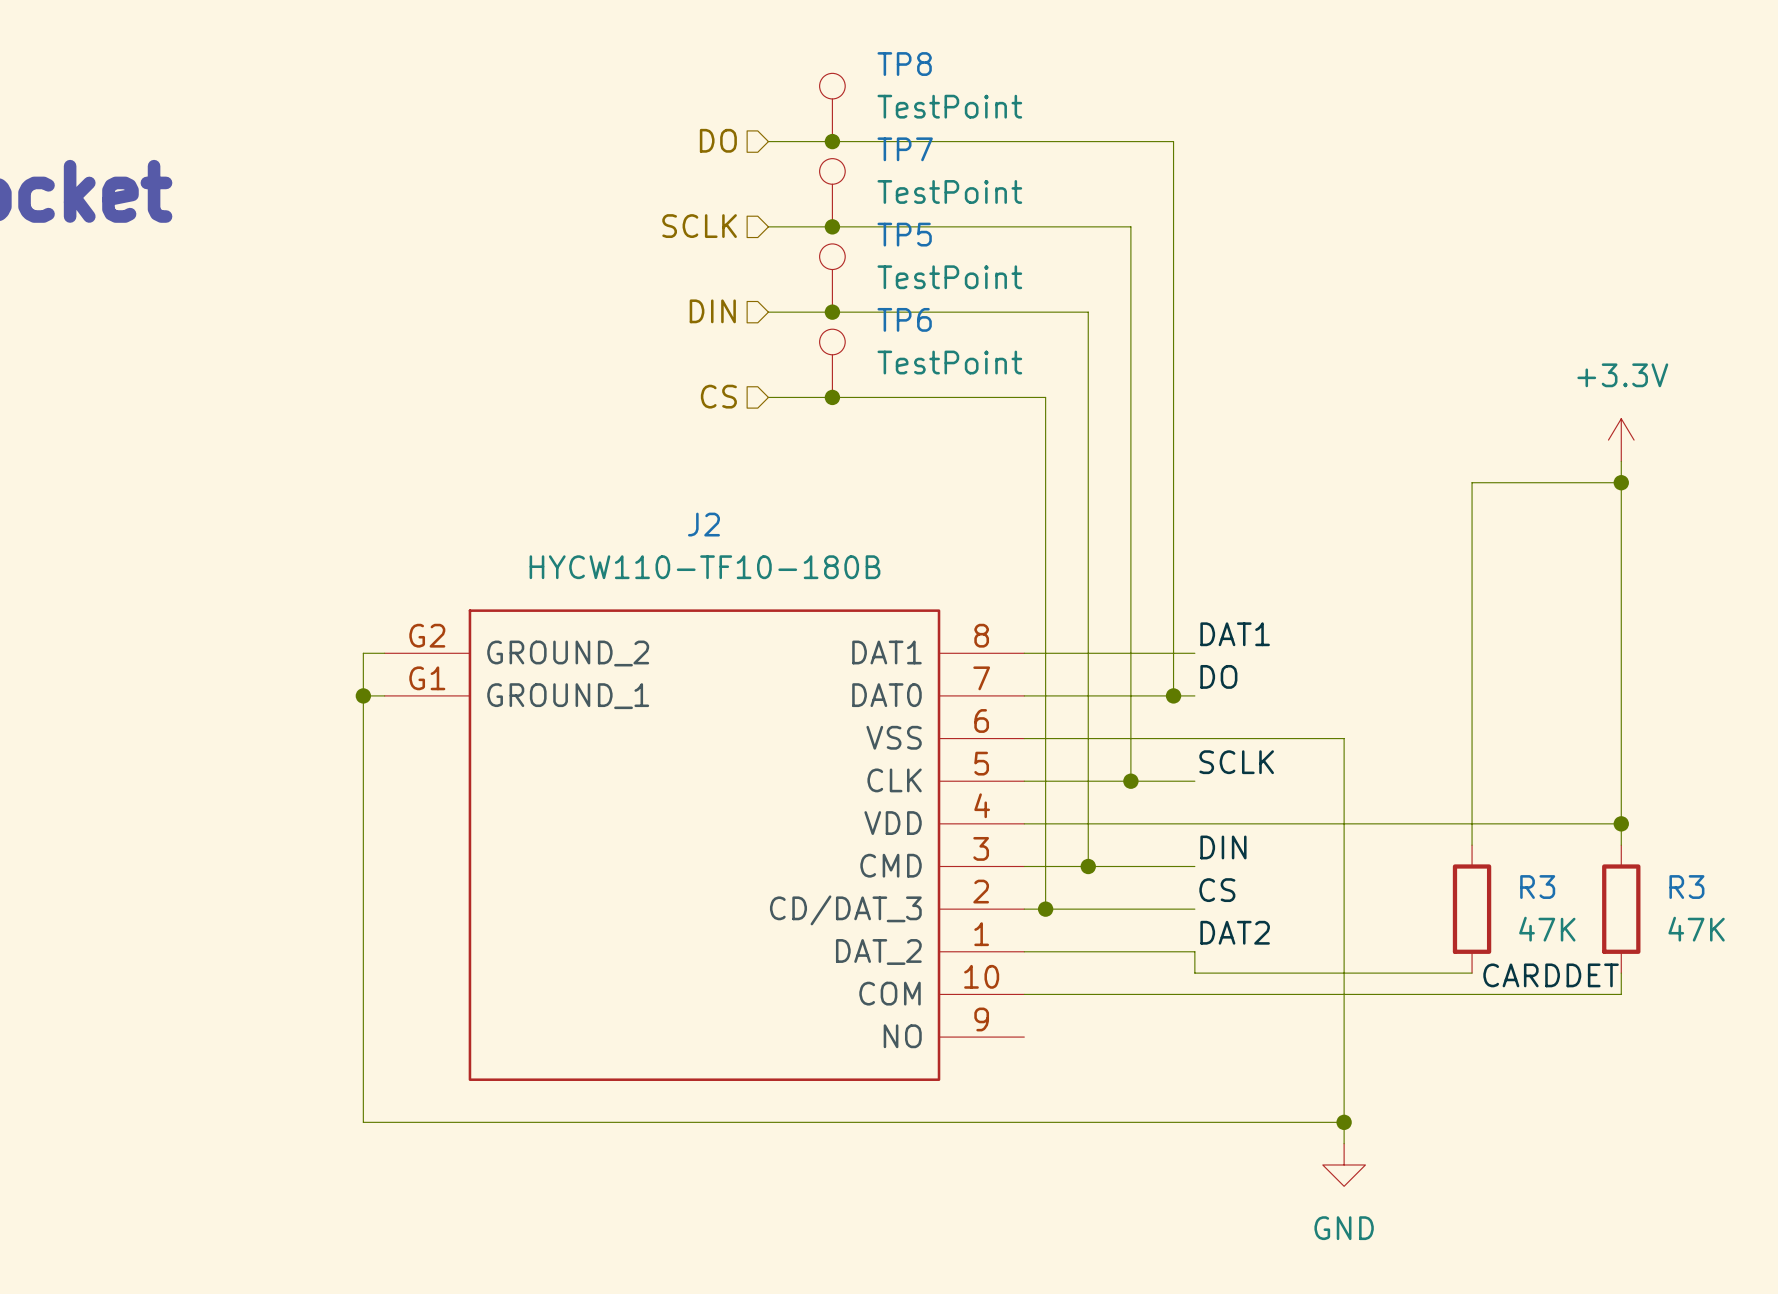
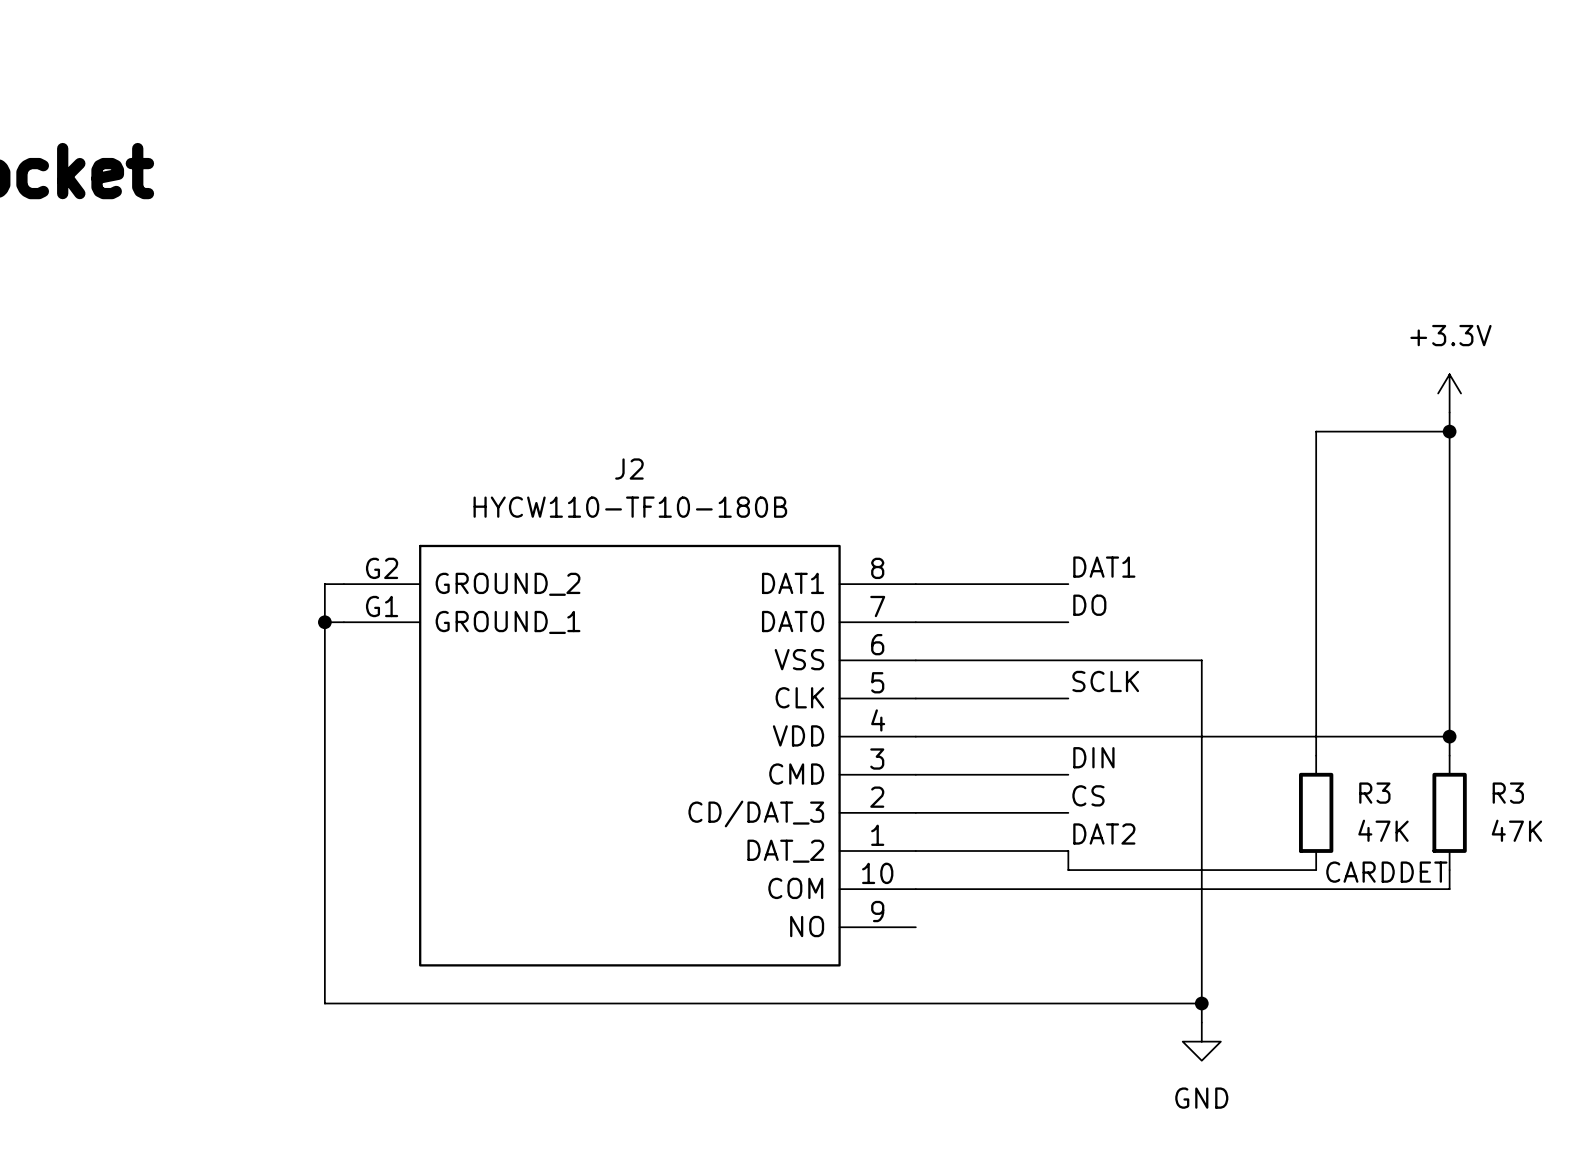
TP8: TestPoint (832, 107) -> none
hierarchical label: DO (718, 140) -> none
wire: (768, 141) (1173, 141) (1173, 695) -> none
junction: (832, 141) -> none
TP7: TestPoint (832, 192) -> none
hierarchical label: SCLK (699, 226) -> none
wire: (768, 226) (1130, 226) (1130, 781) -> none
junction: (832, 226) -> none
TP5: TestPoint (832, 278) -> none
hierarchical label: DIN (712, 311) -> none
wire: (768, 312) (1088, 312) (1088, 866) -> none
junction: (832, 312) -> none
TP6: TestPoint (832, 363) -> none
hierarchical label: CS (718, 396) -> none
wire: (768, 397) (1045, 397) (1045, 909) -> none
junction: (832, 397) -> none
junction: (1173, 695) -> none
junction: (1130, 781) -> none
junction: (1088, 866) -> none
junction: (1045, 909) -> none

